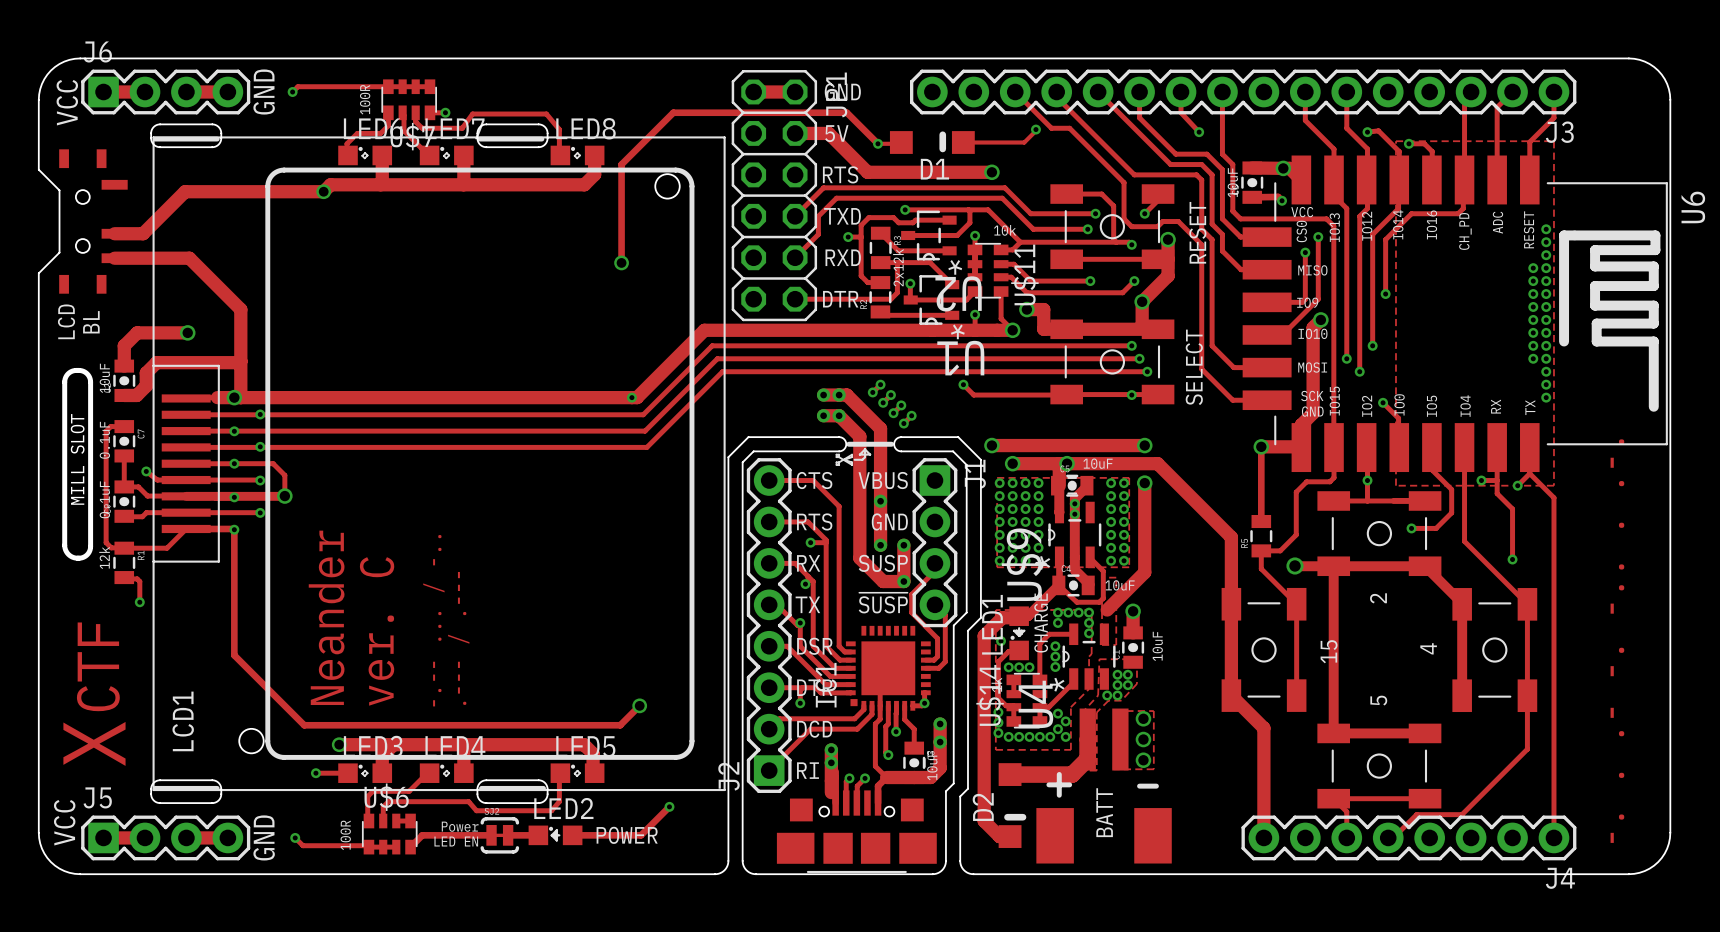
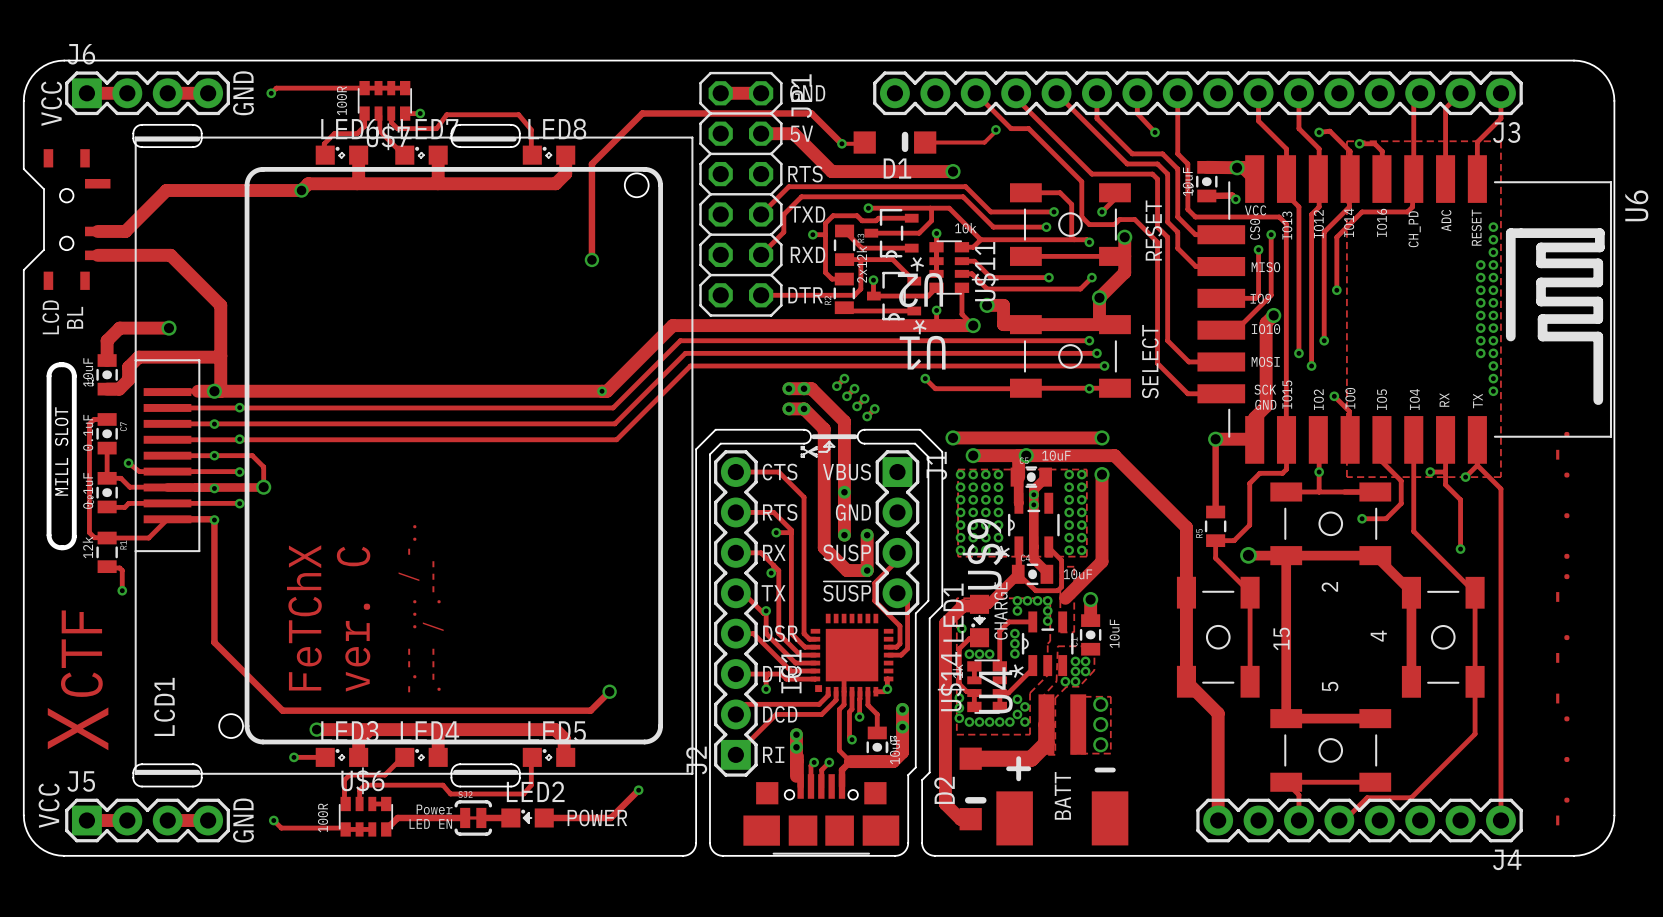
text: Neander (326, 617) -> FeTChX (304, 617)

